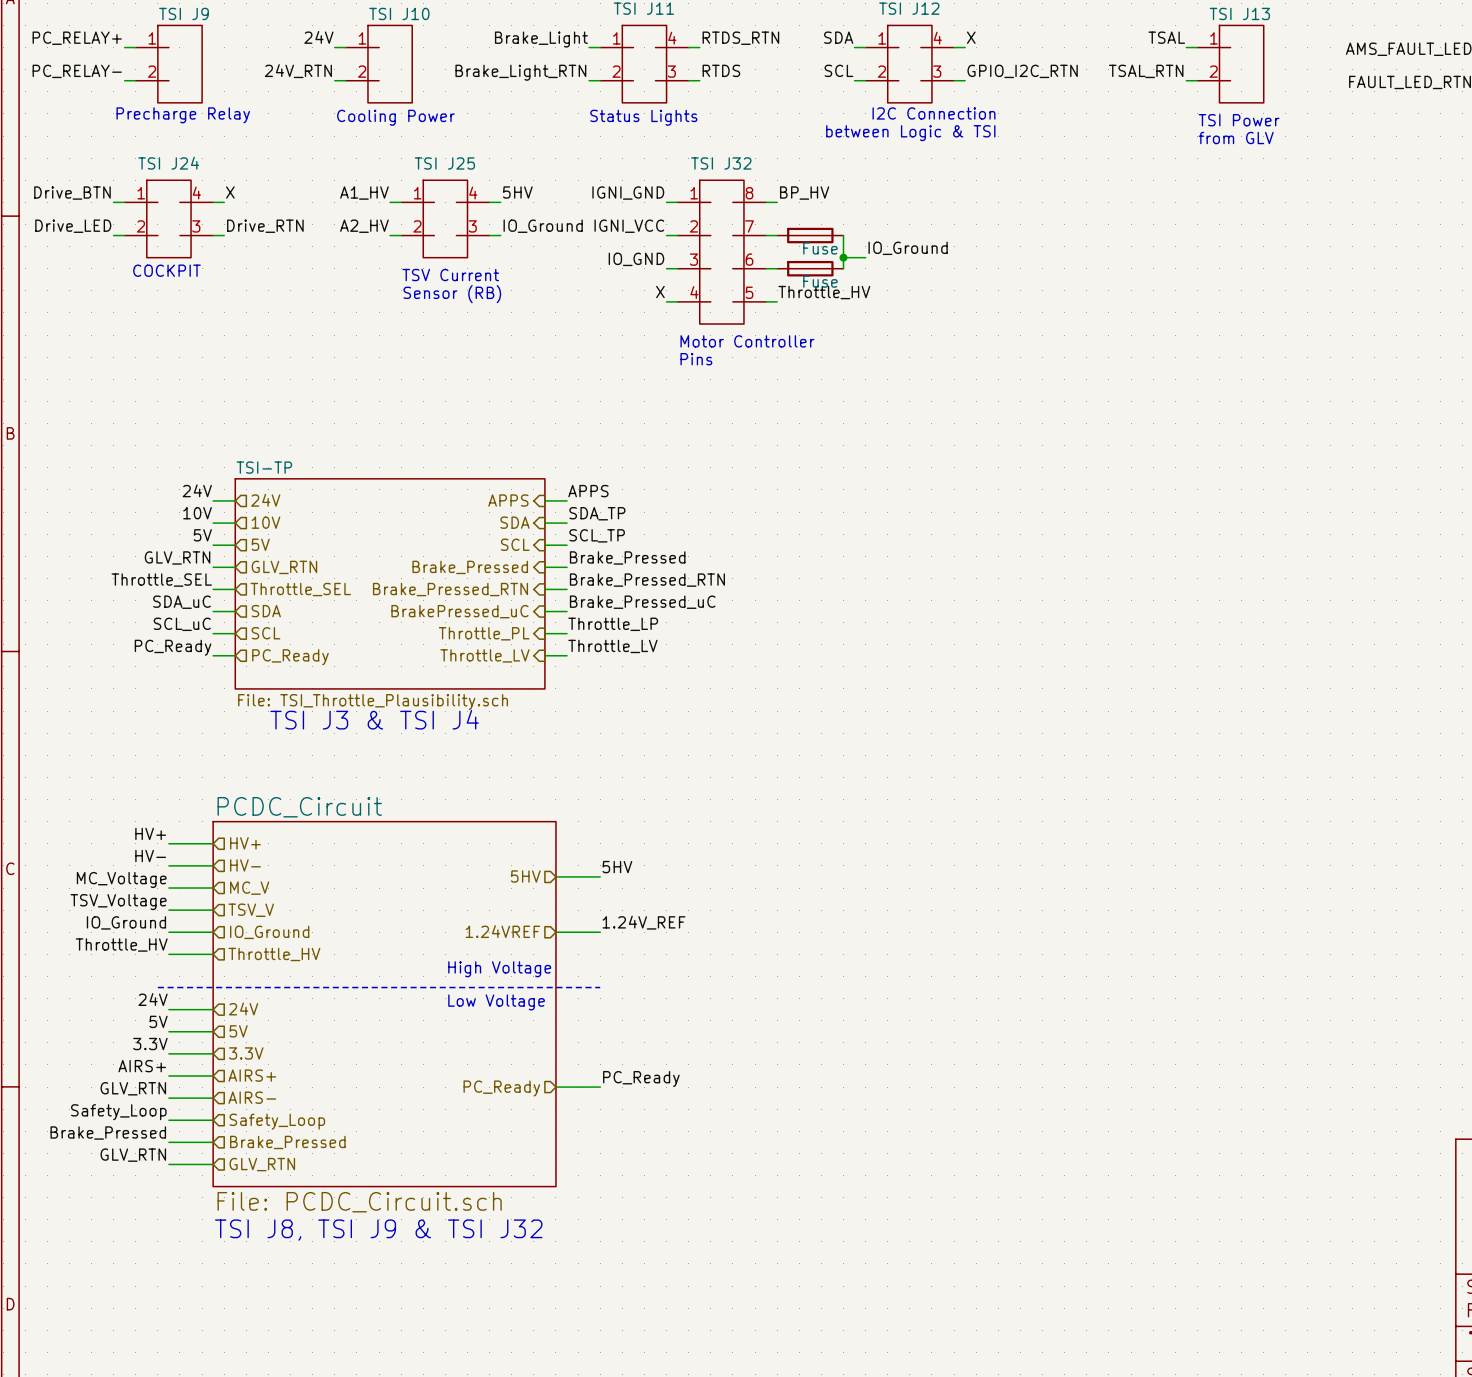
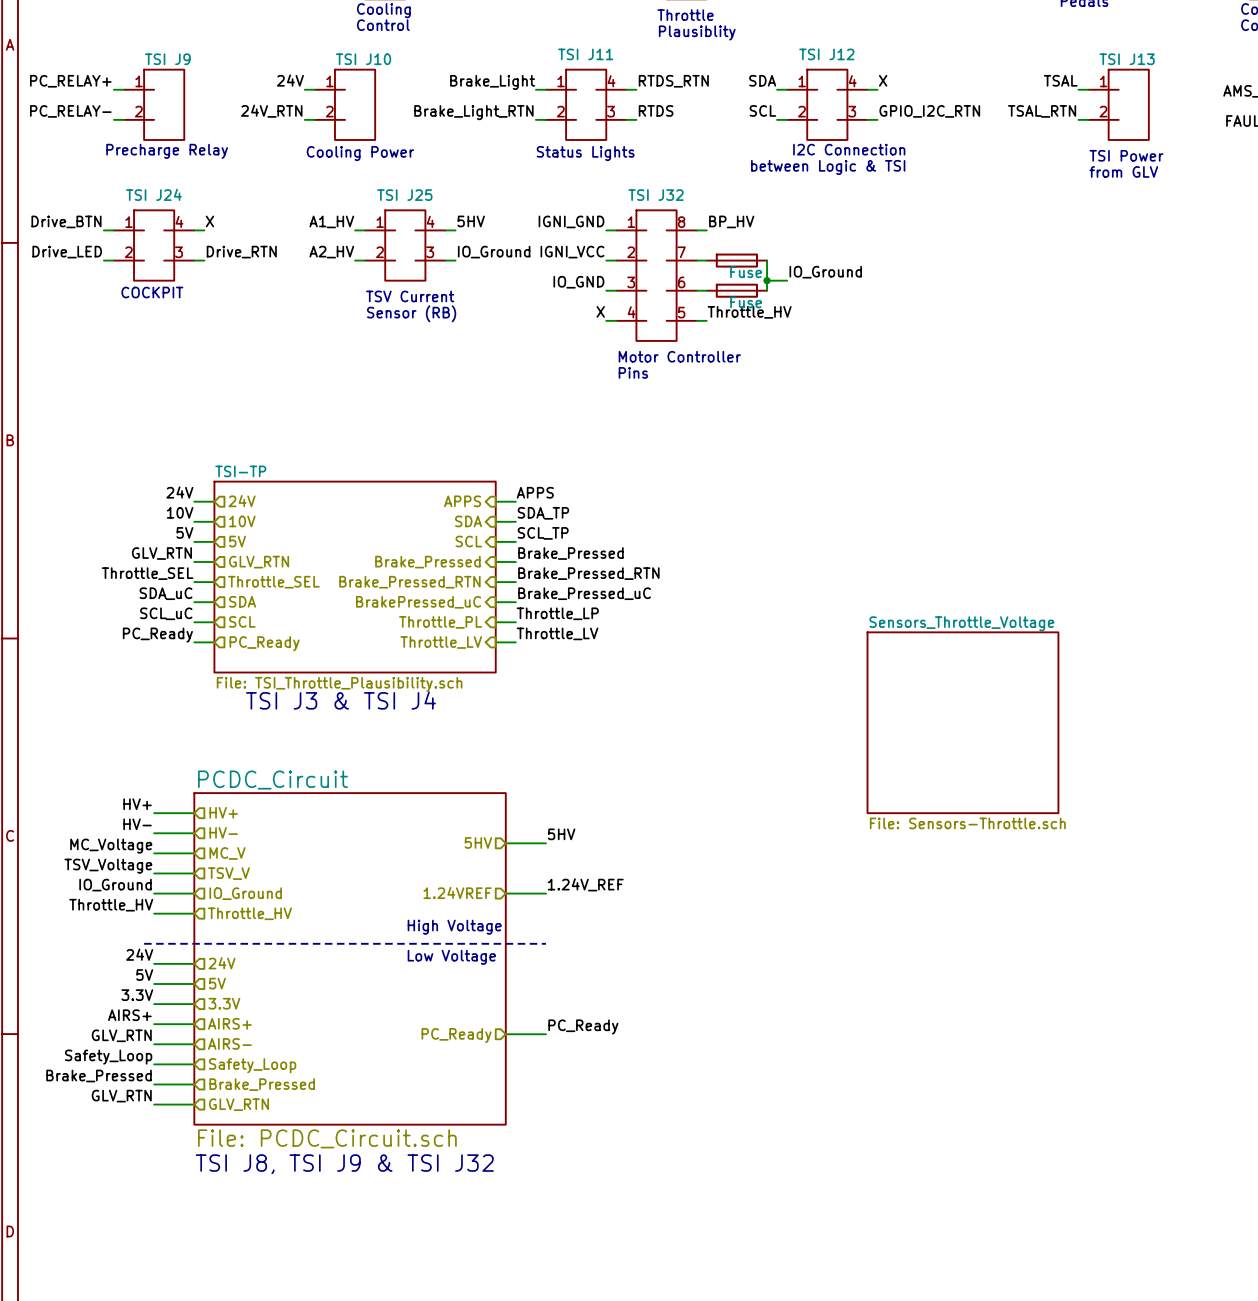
sheet Sensors_Throttle_Voltage: none -> File: Sensors-Throttle.sch (962, 722)

